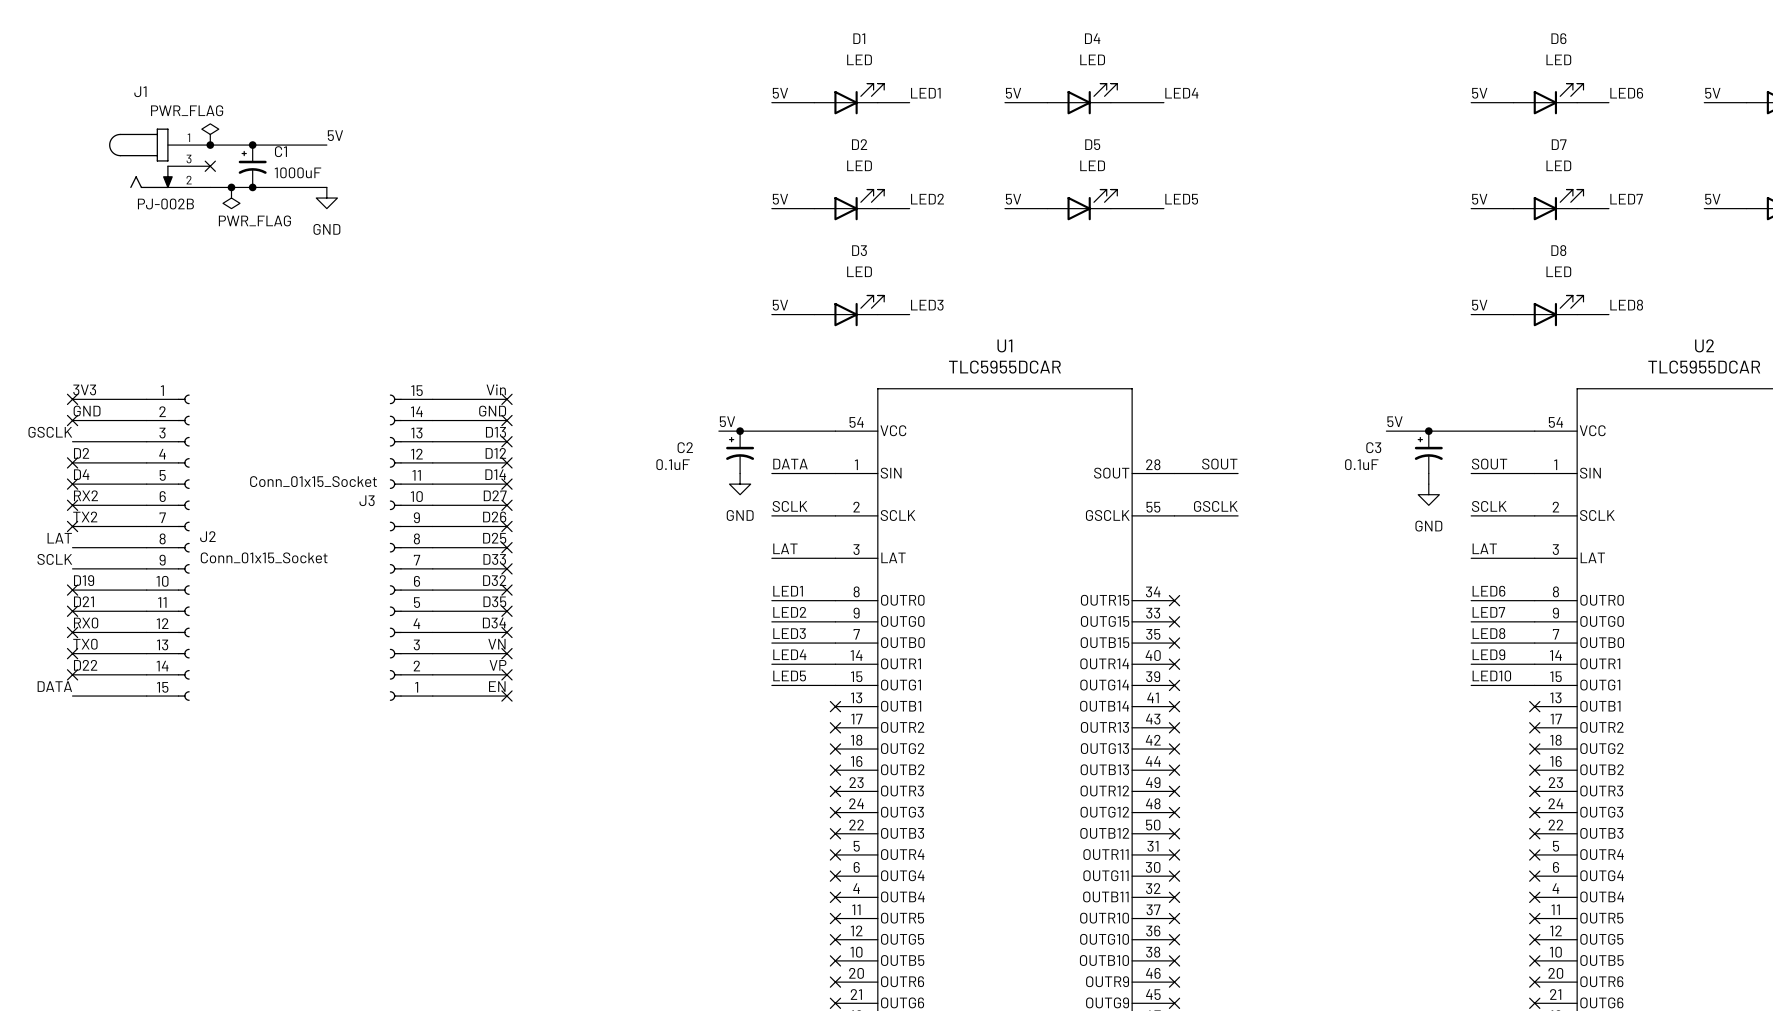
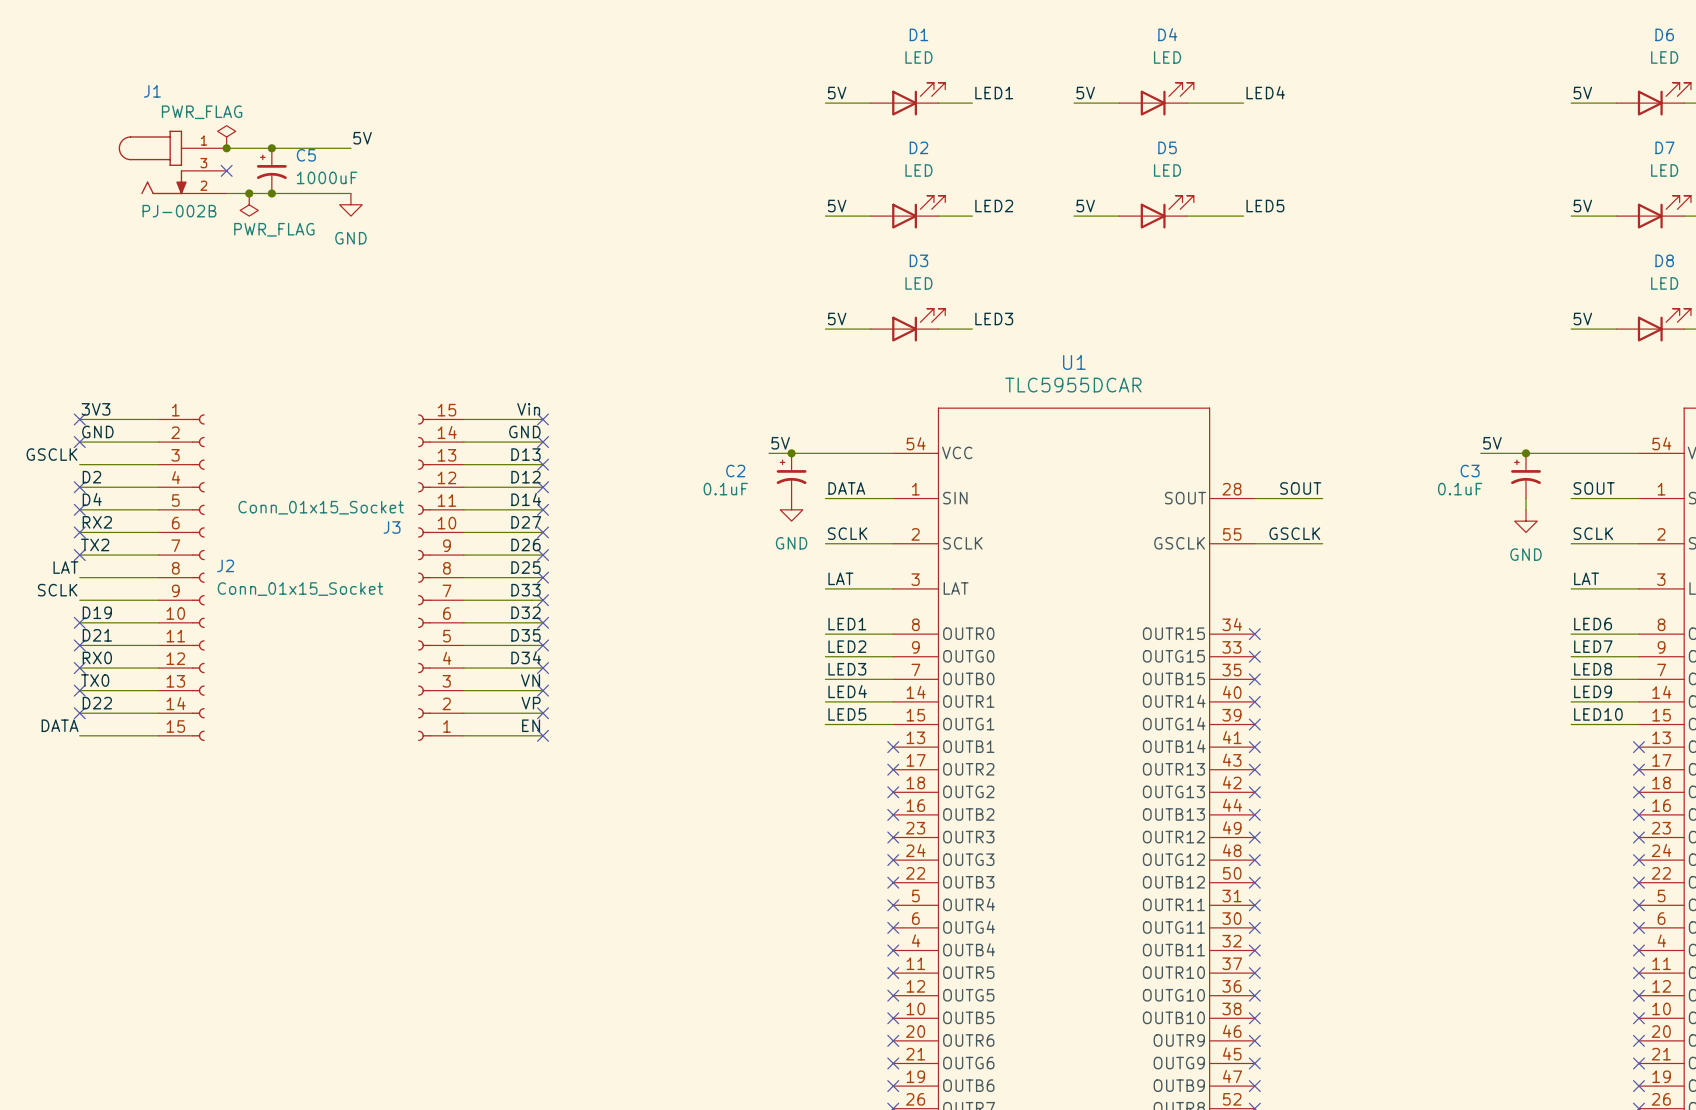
C1 name: C1 (280, 151) -> C5 (306, 155)

